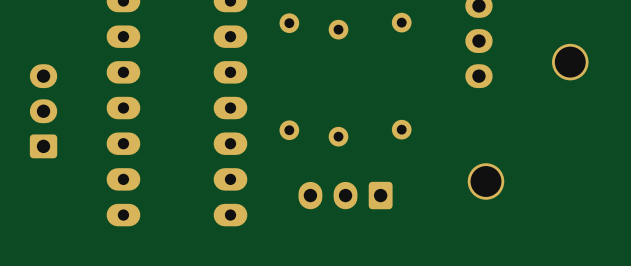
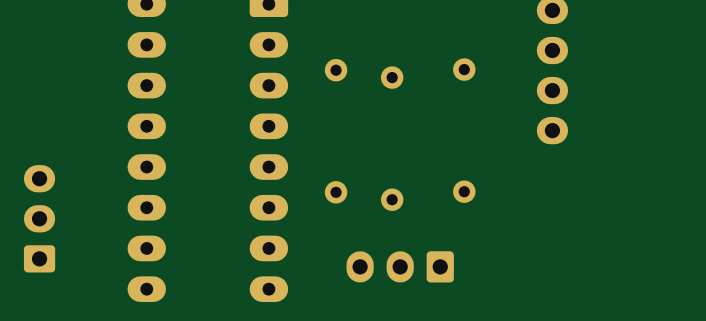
part: (570, 62) -> none
part position: (43, 111) -> (39, 218)
part: (485, 181) -> none

